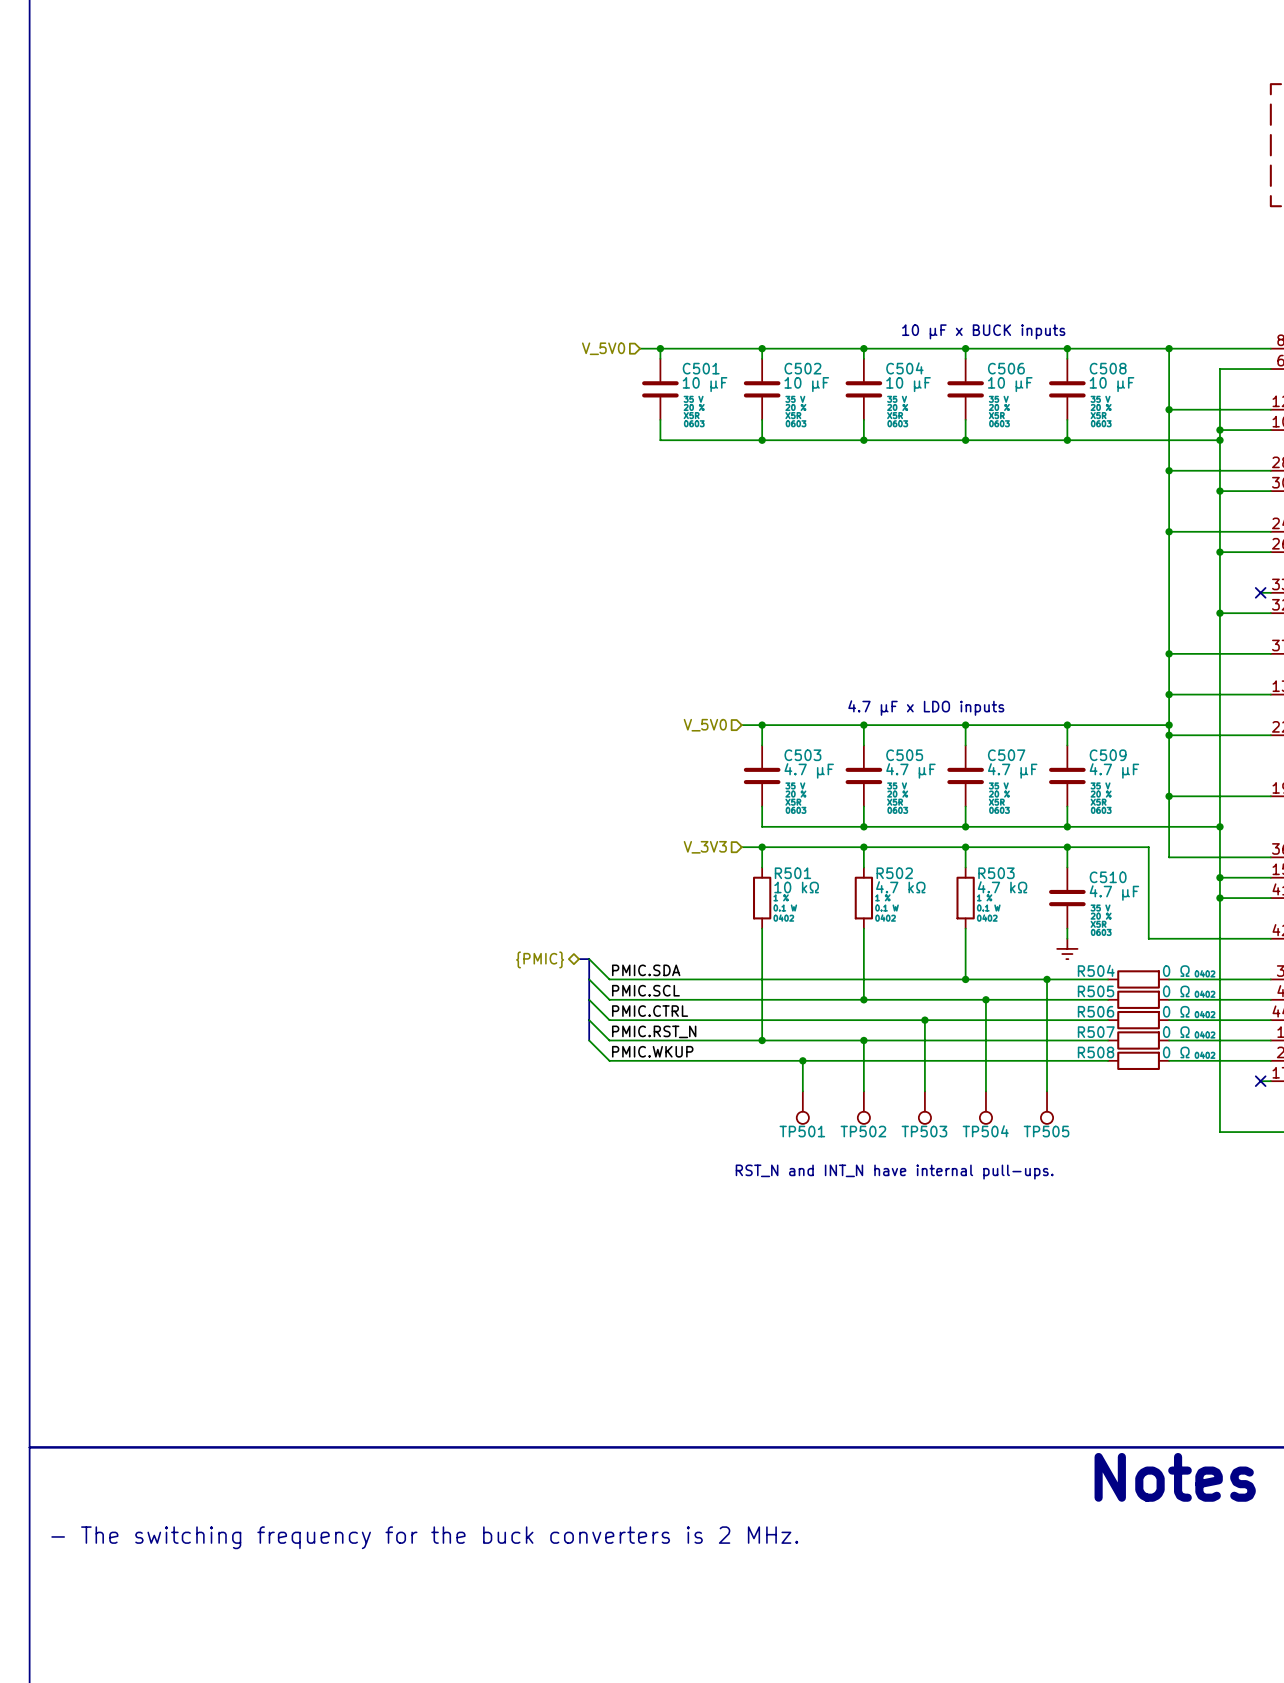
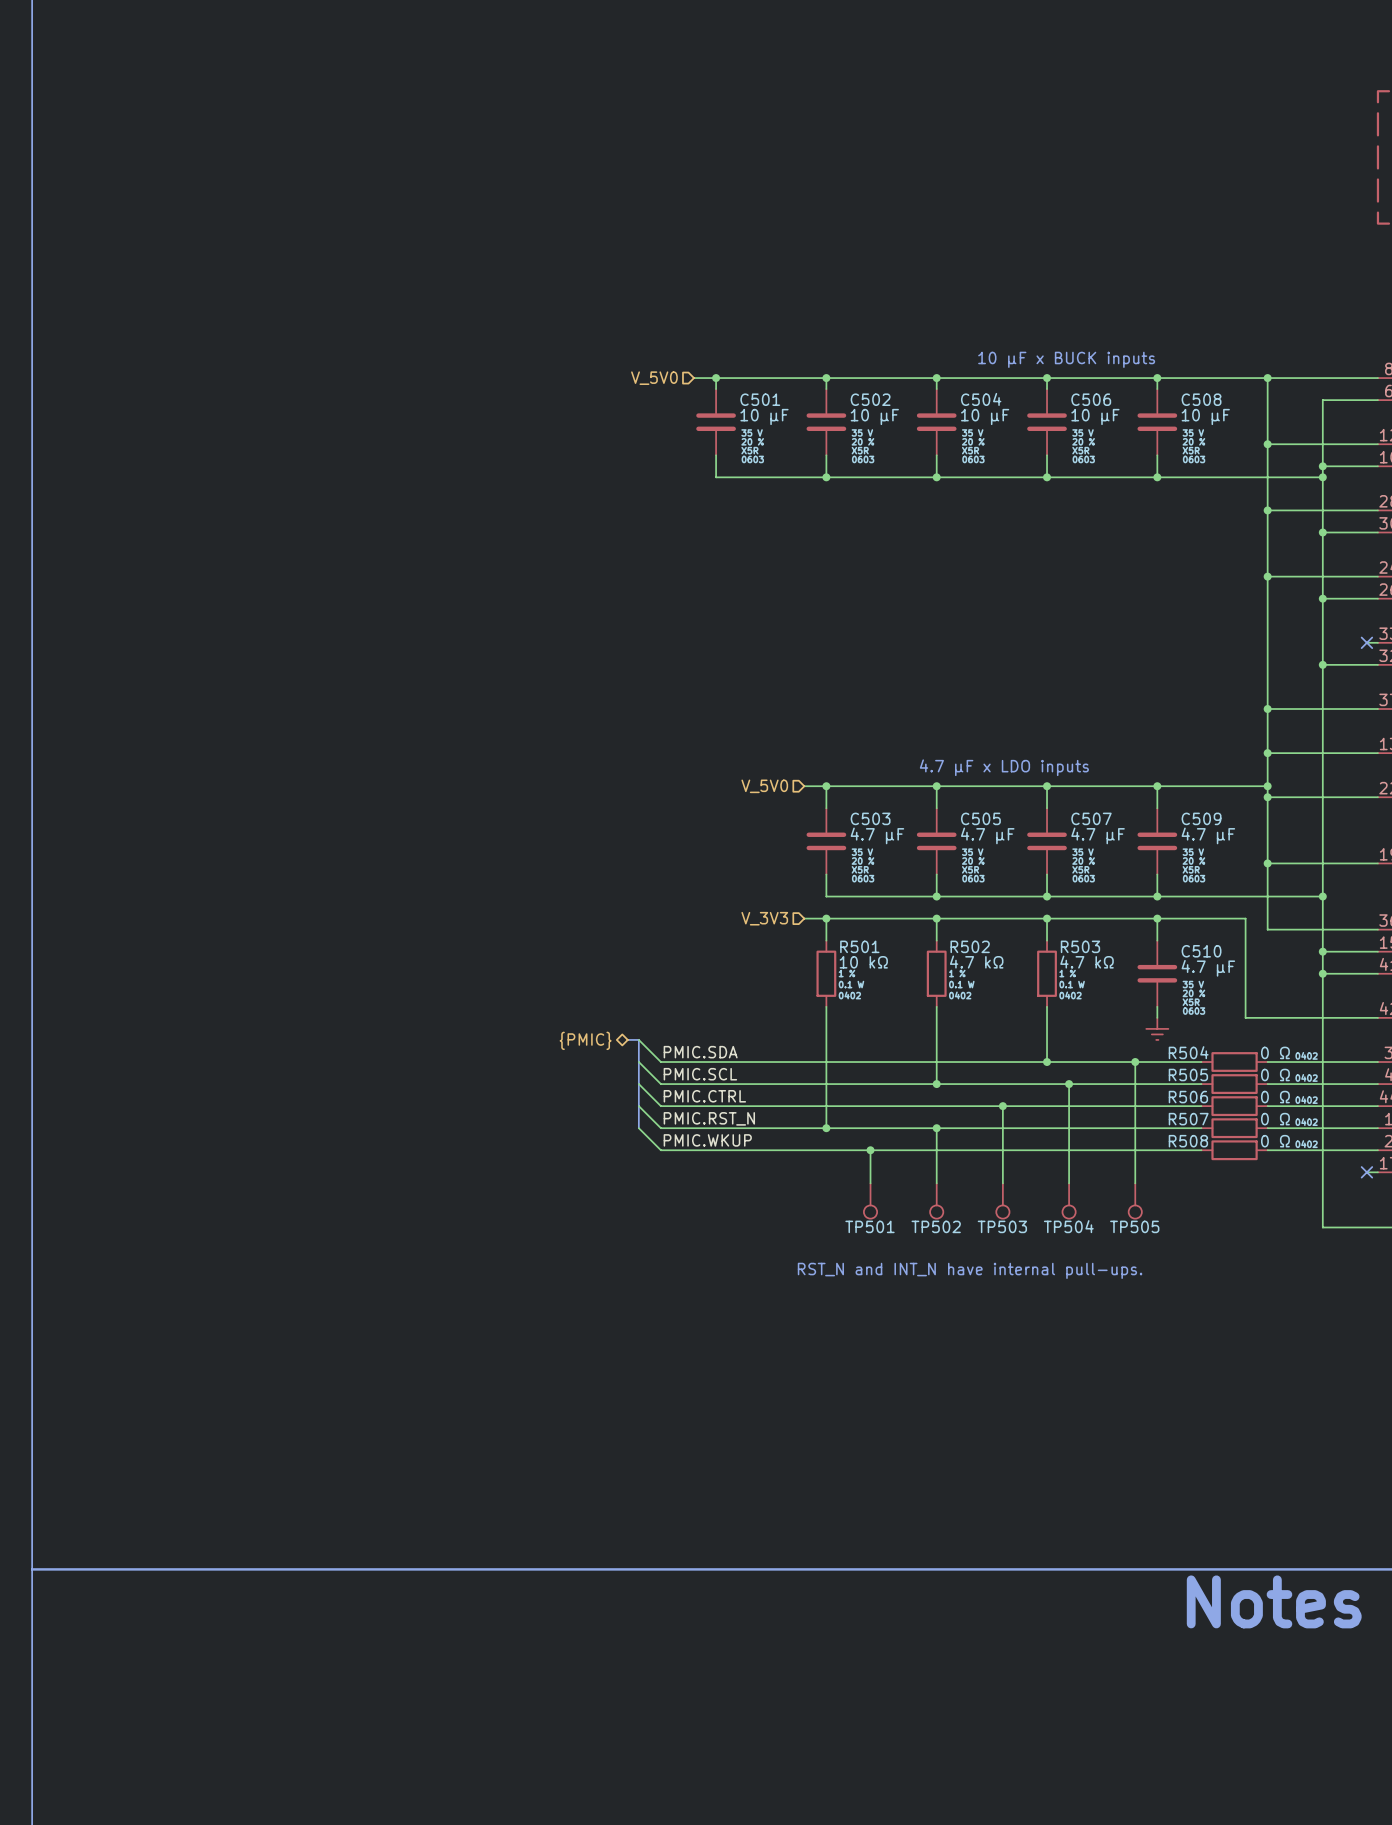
text: - The switching frequency for the buck converters is 2 MHz. (424, 1537) -> none

